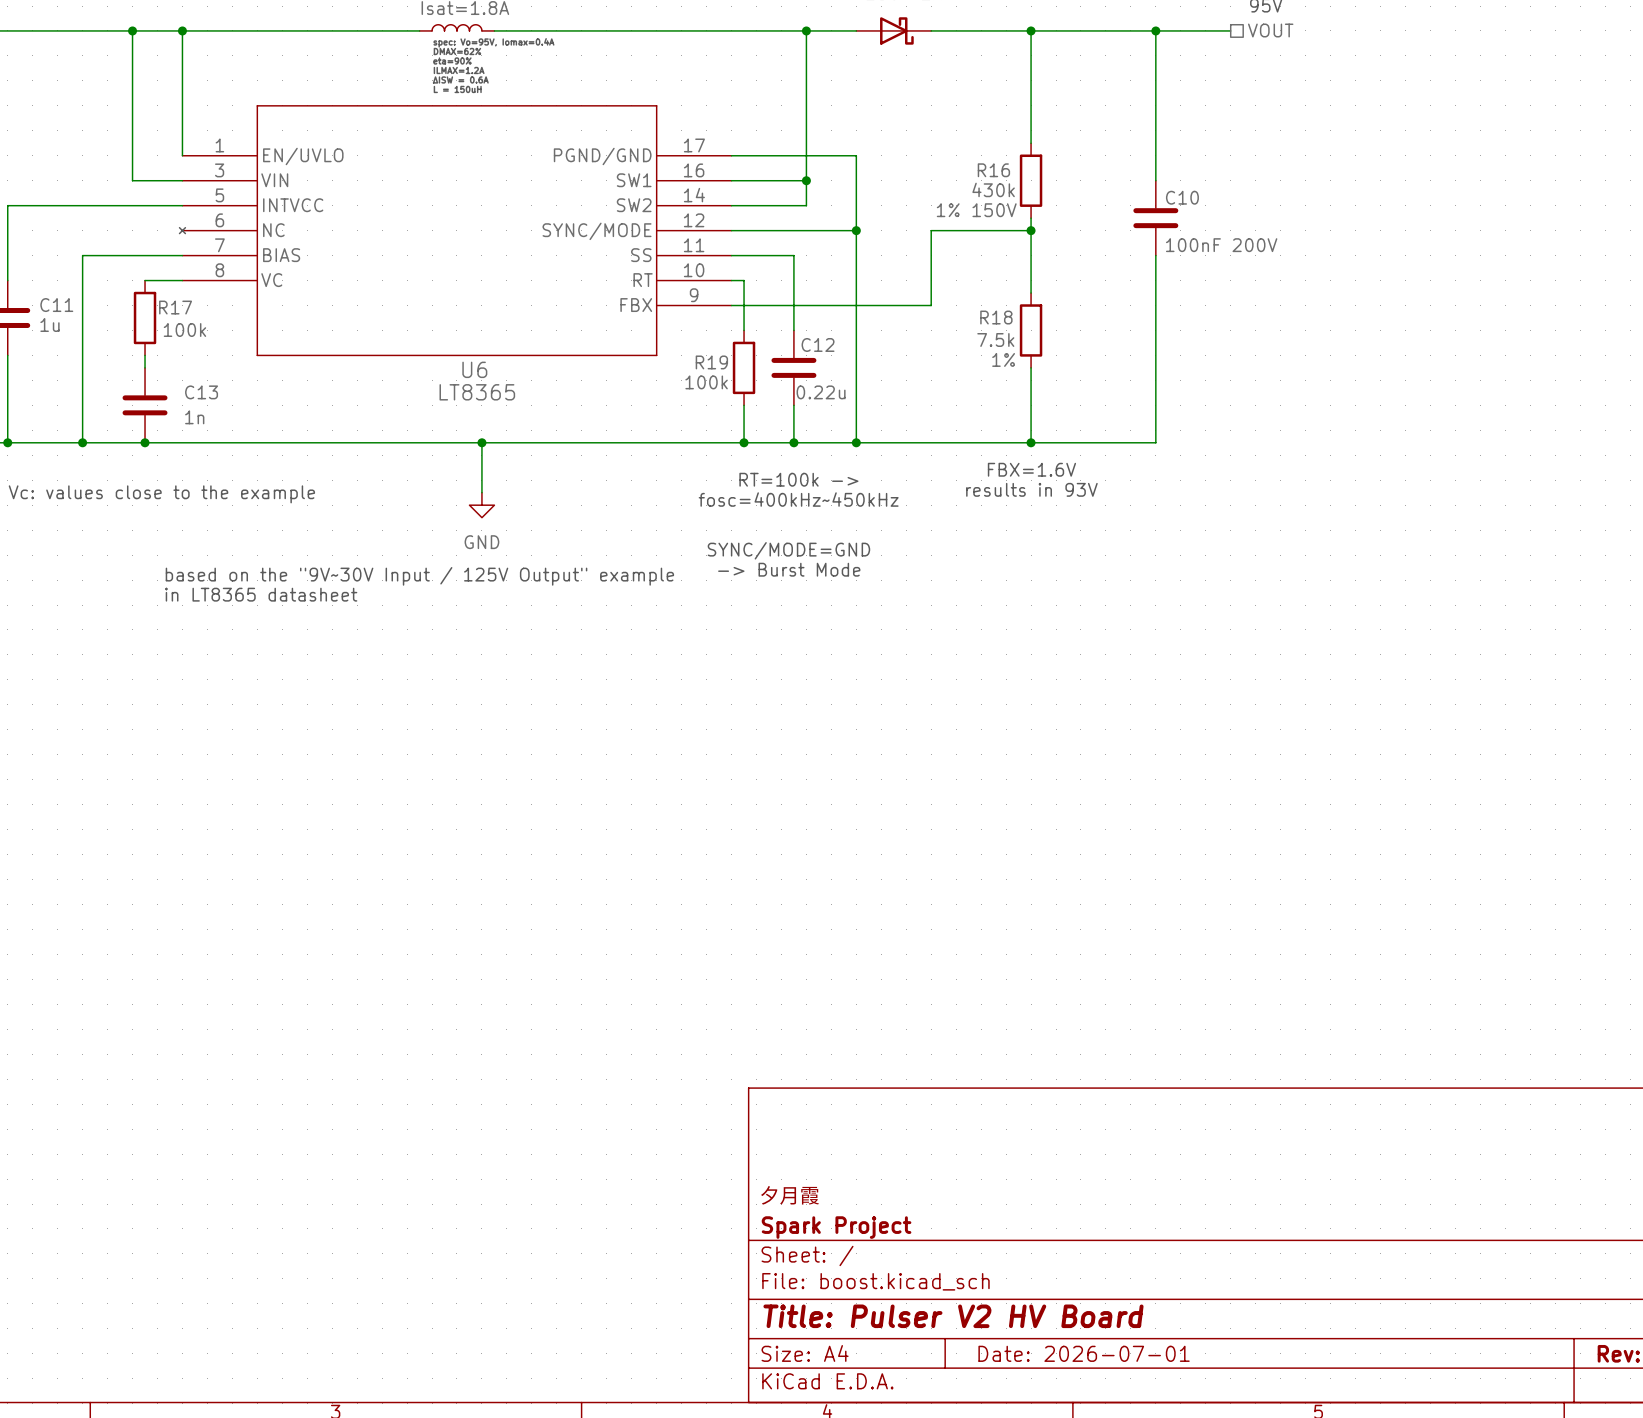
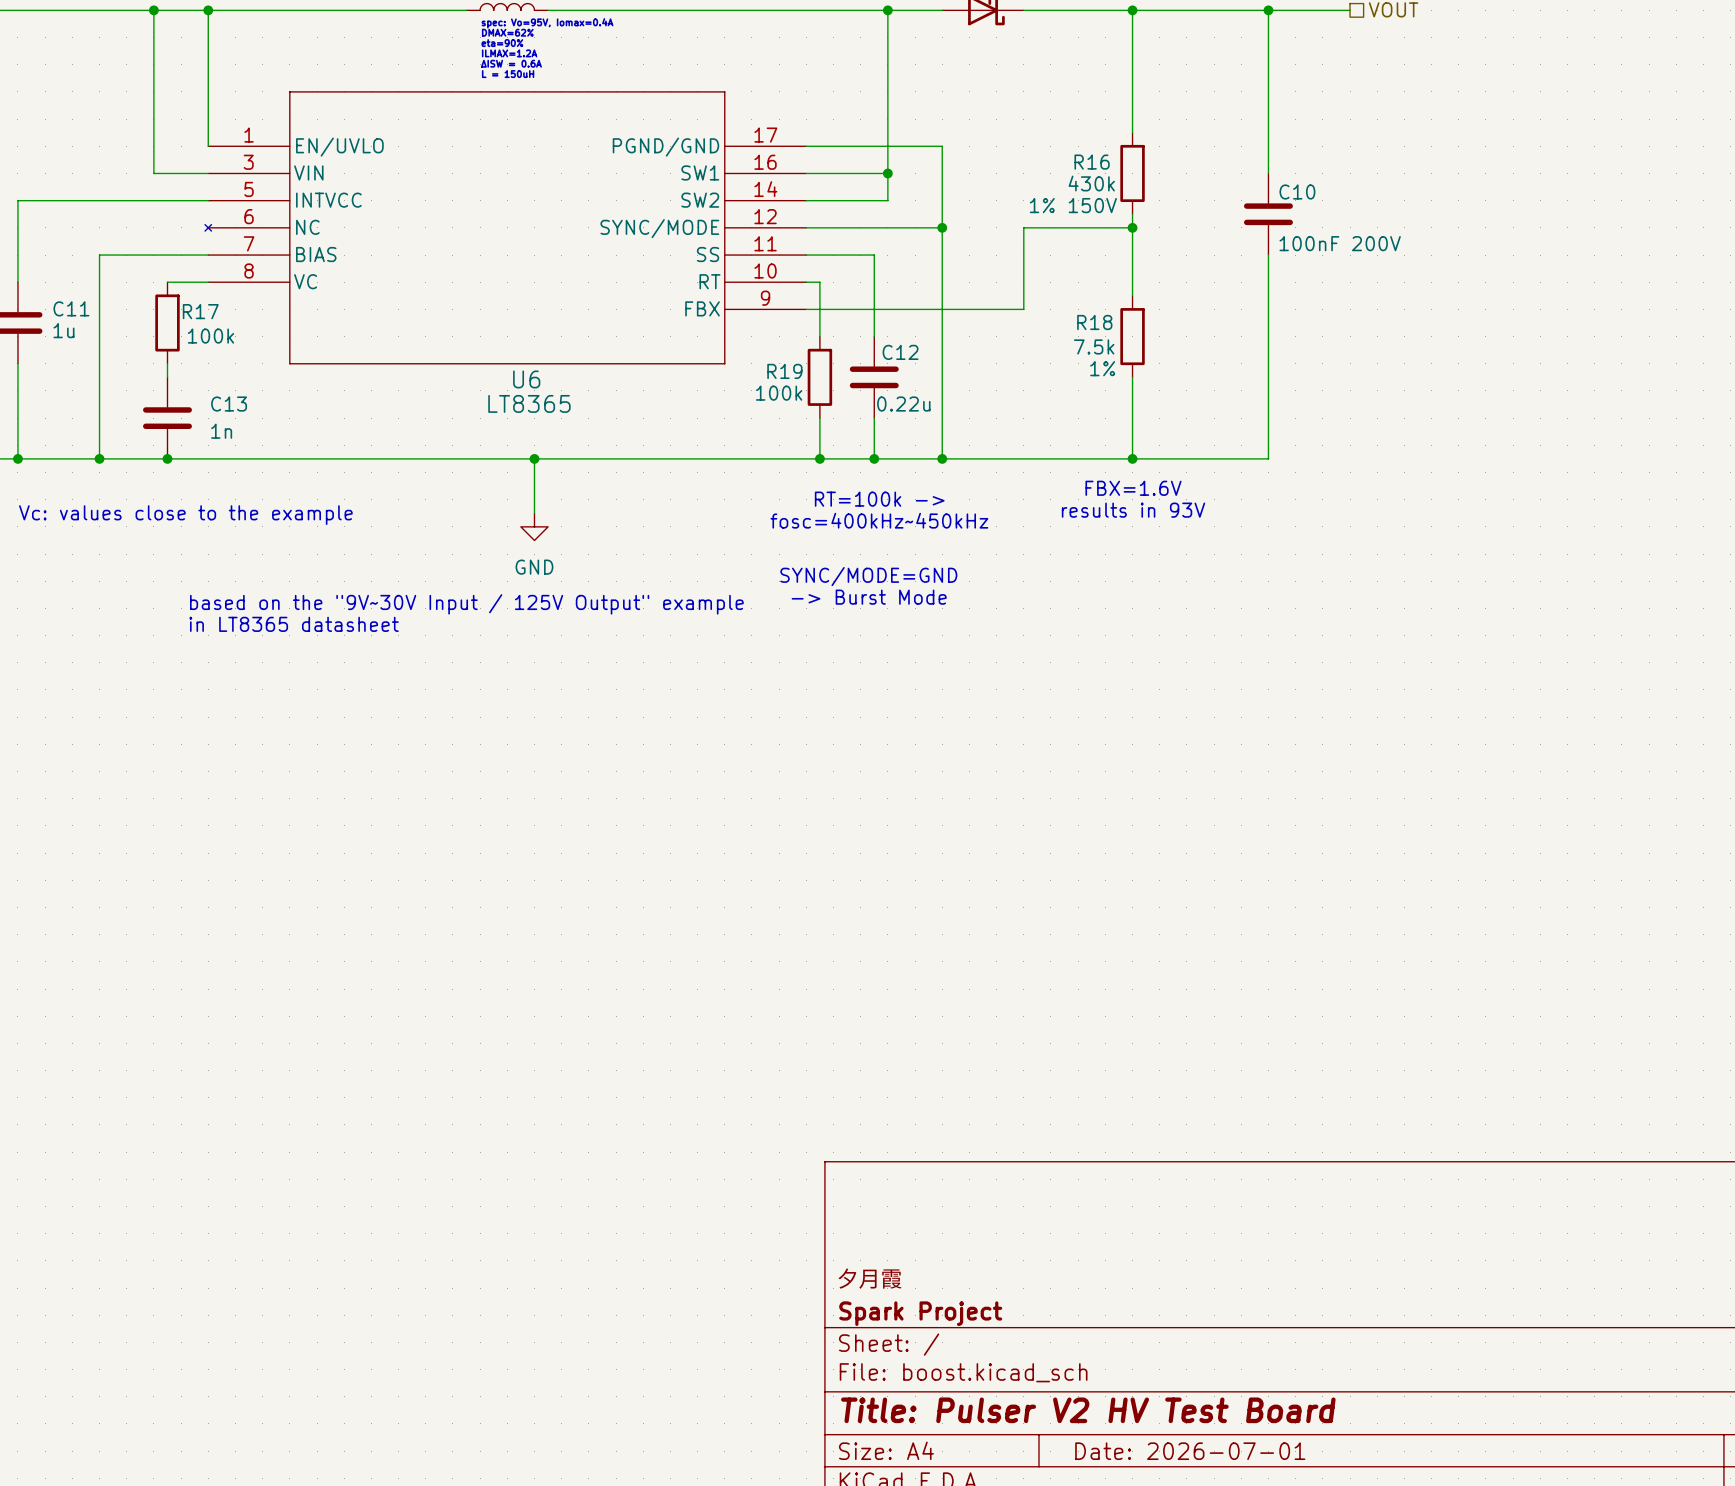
title block: Title: Pulser V2 HV Board (953, 1316) -> Title: Pulser V2 HV Test Board (1088, 1410)

